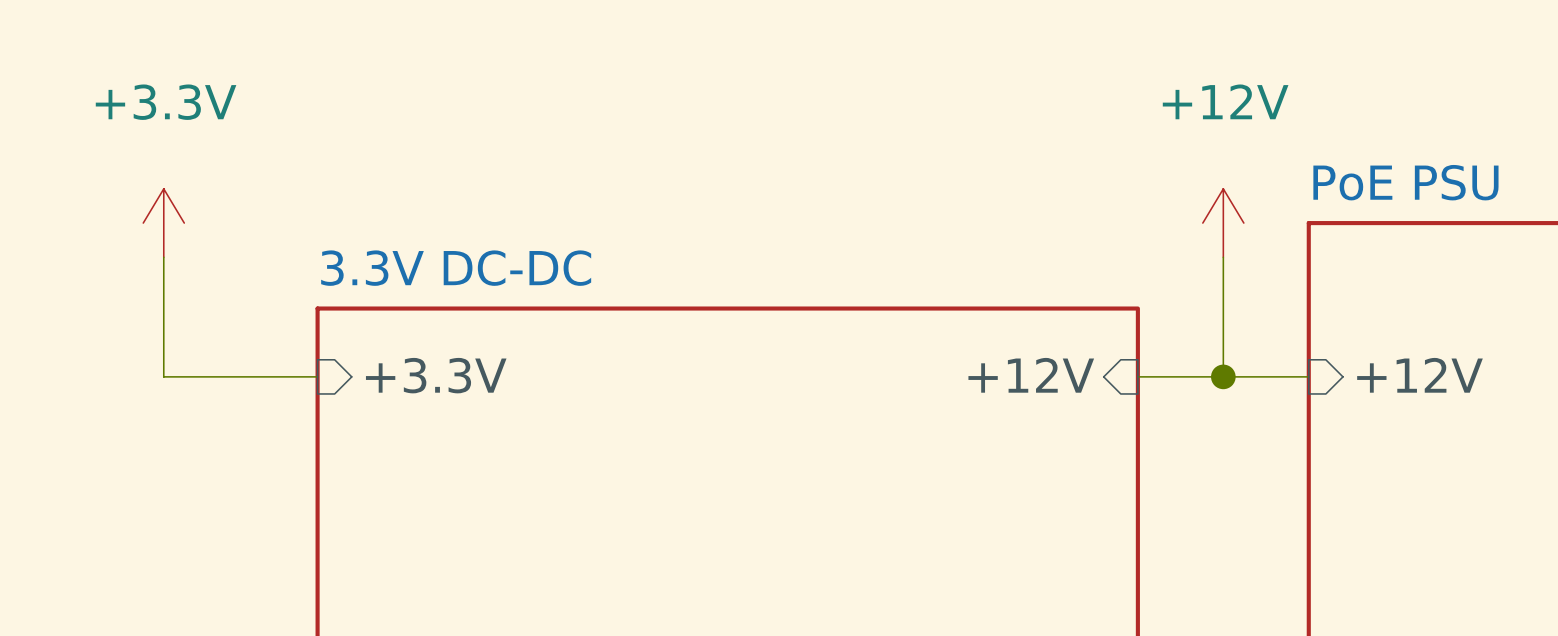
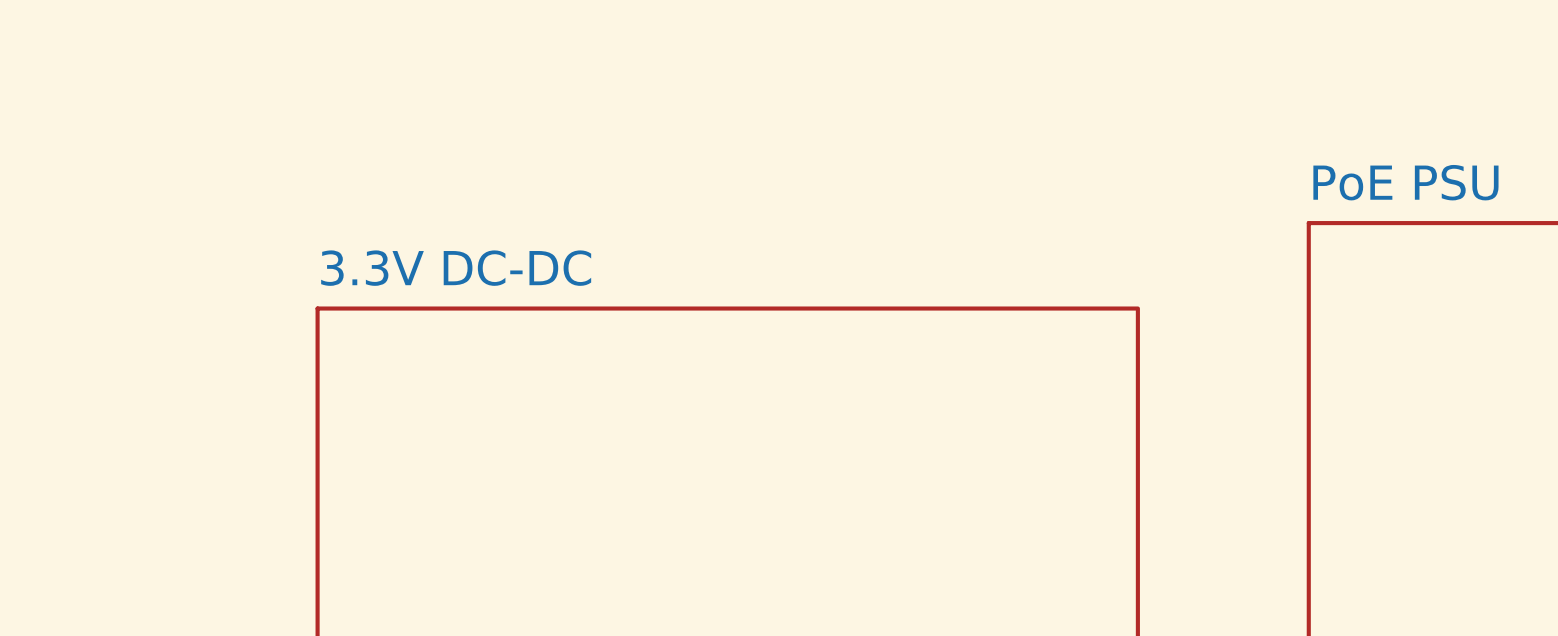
power symbol: +3.3V (163, 223) -> none
power symbol: +12V (1223, 223) -> none
wire: (163, 257) (163, 376) (317, 376) -> none
wire: (1223, 257) (1223, 376) -> none
sheet pin: +3.3V (436, 375) -> none
sheet pin: +12V (1031, 375) -> none
sheet pin: +12V (1419, 375) -> none
wire: (1137, 376) (1308, 376) -> none
junction: (1223, 376) -> none

